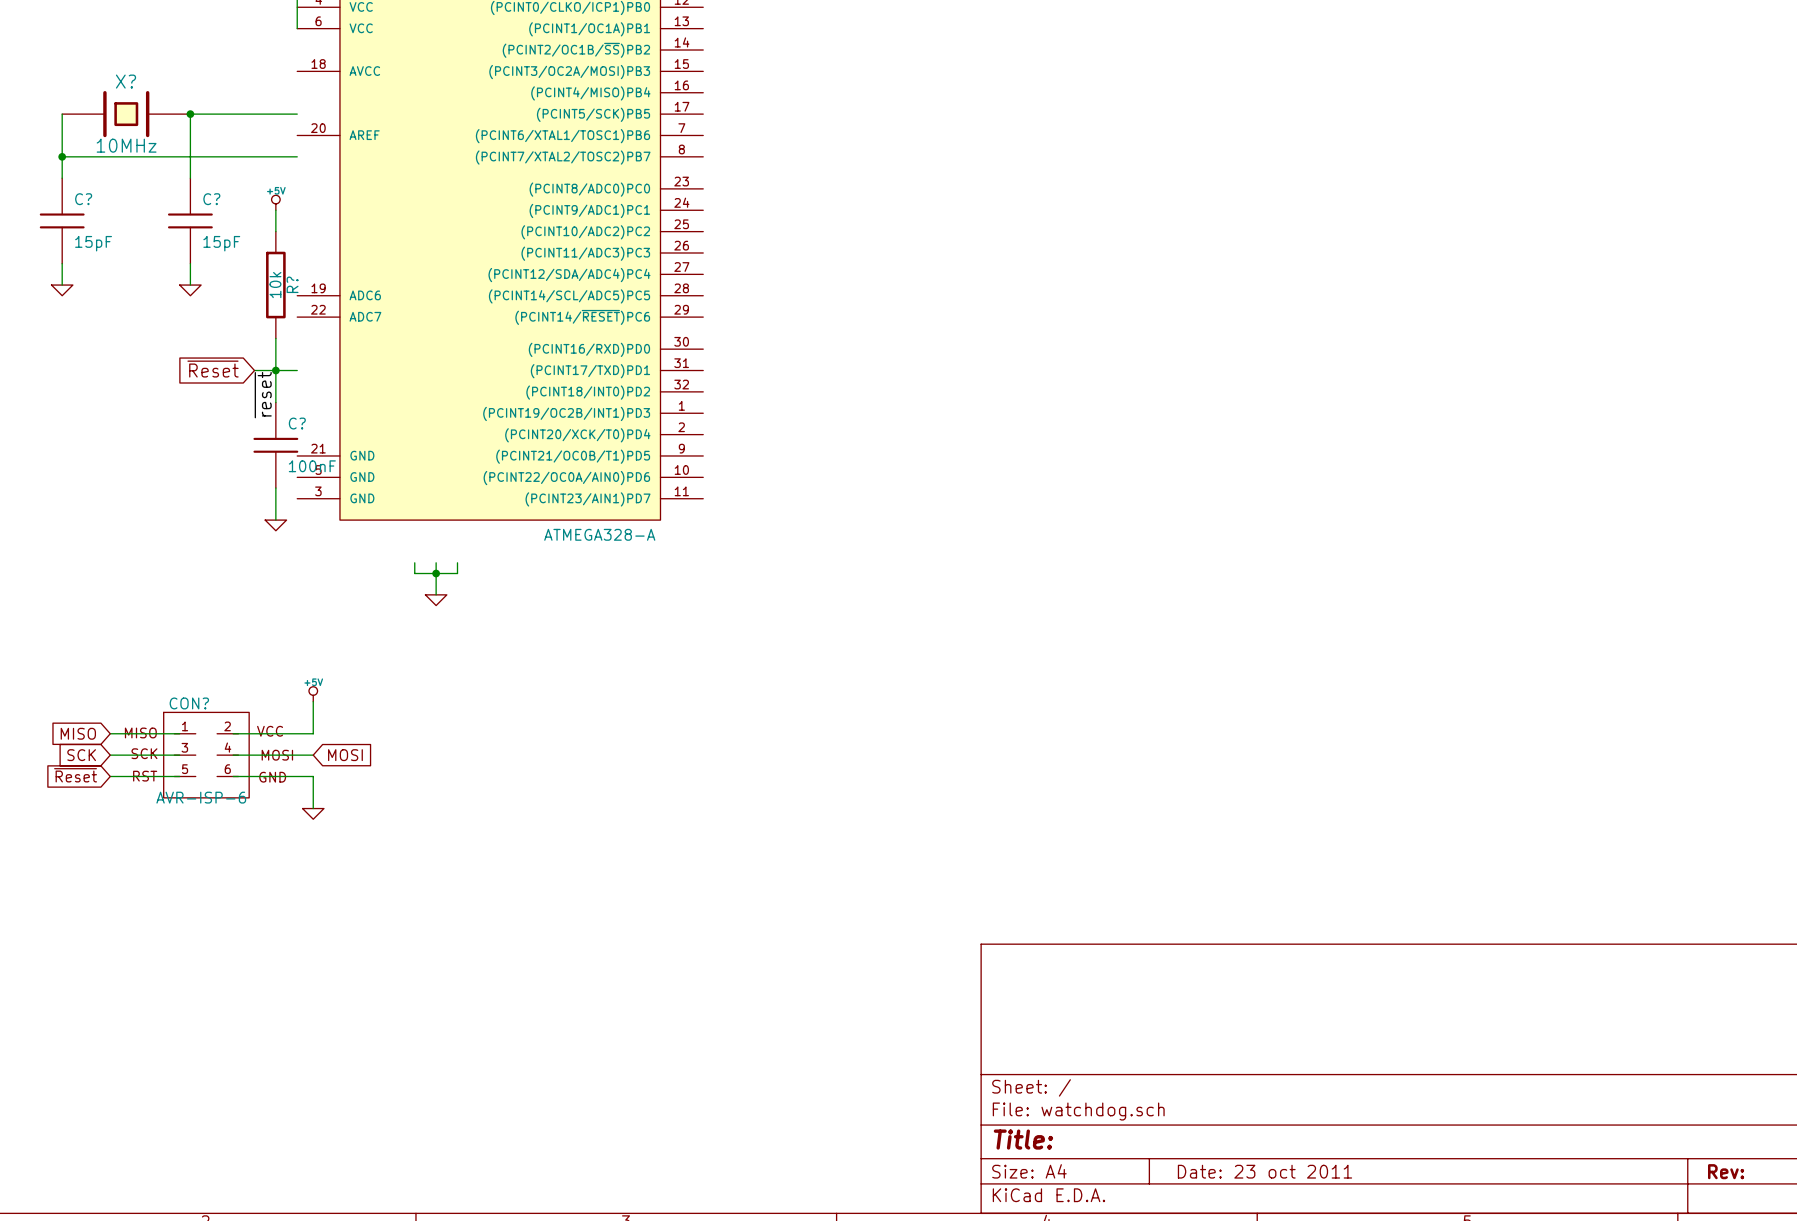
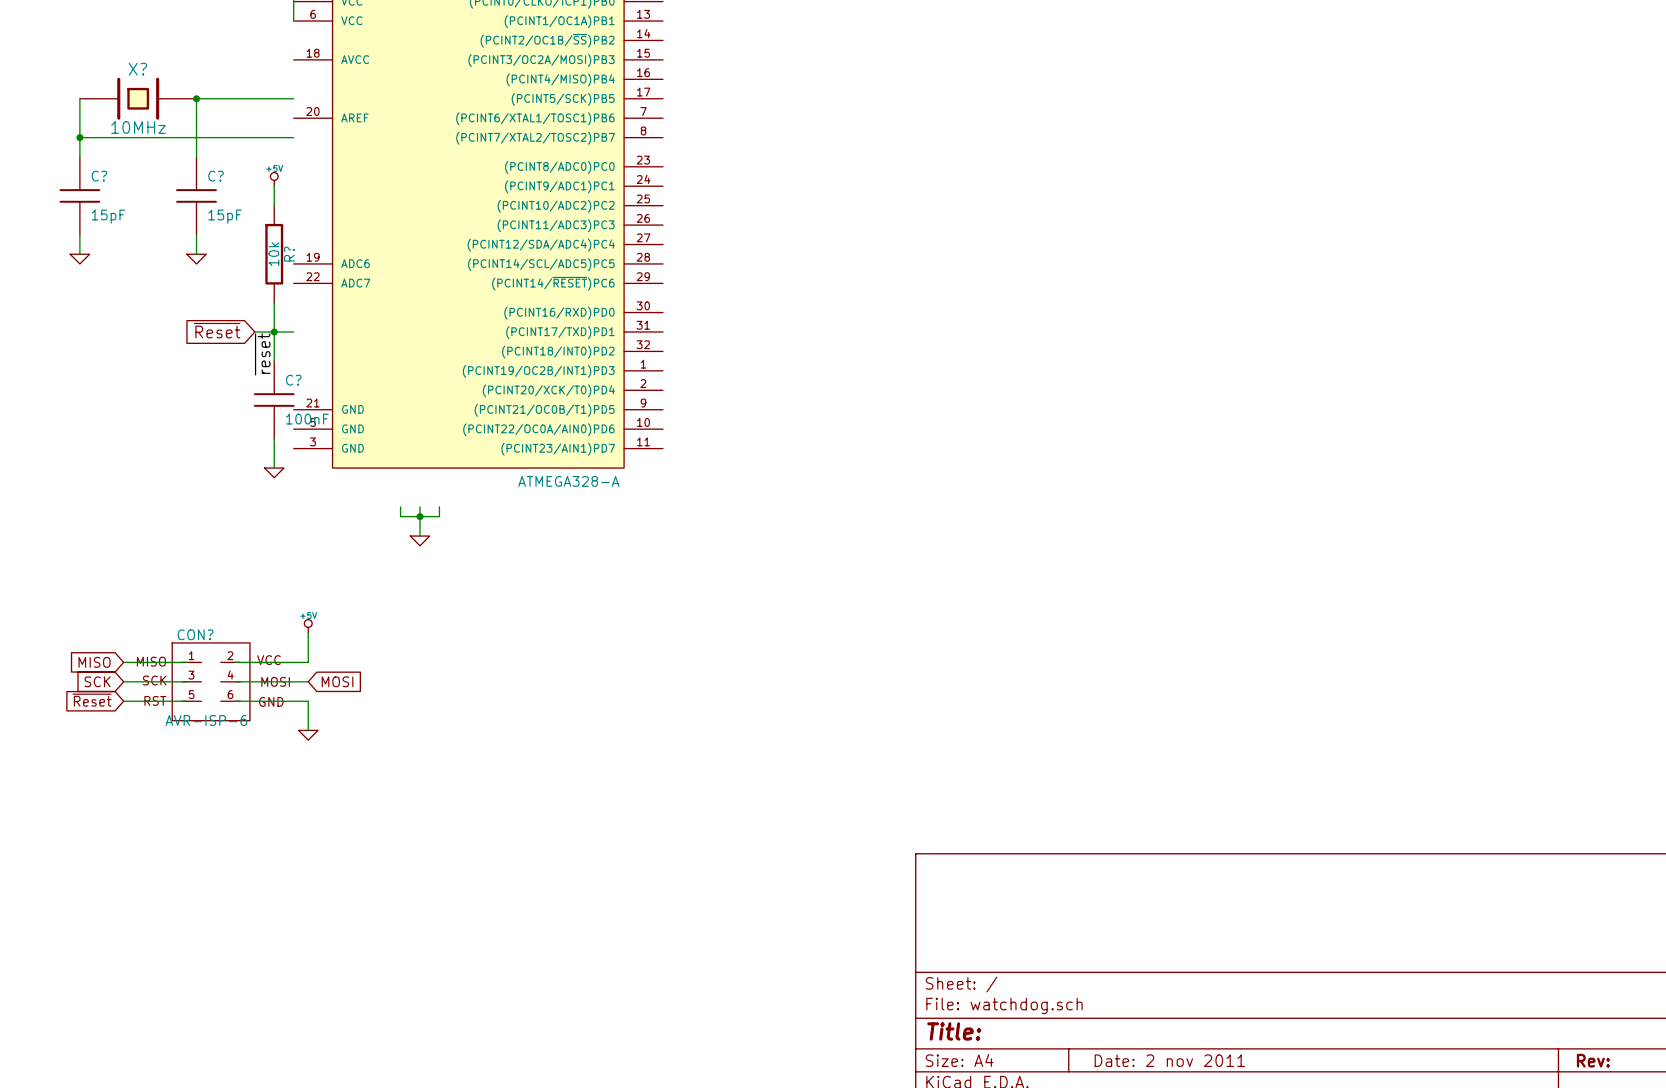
title block: Date: 23 oct 2011 (1264, 1171) -> Date: 2 nov 2011 (1169, 1060)

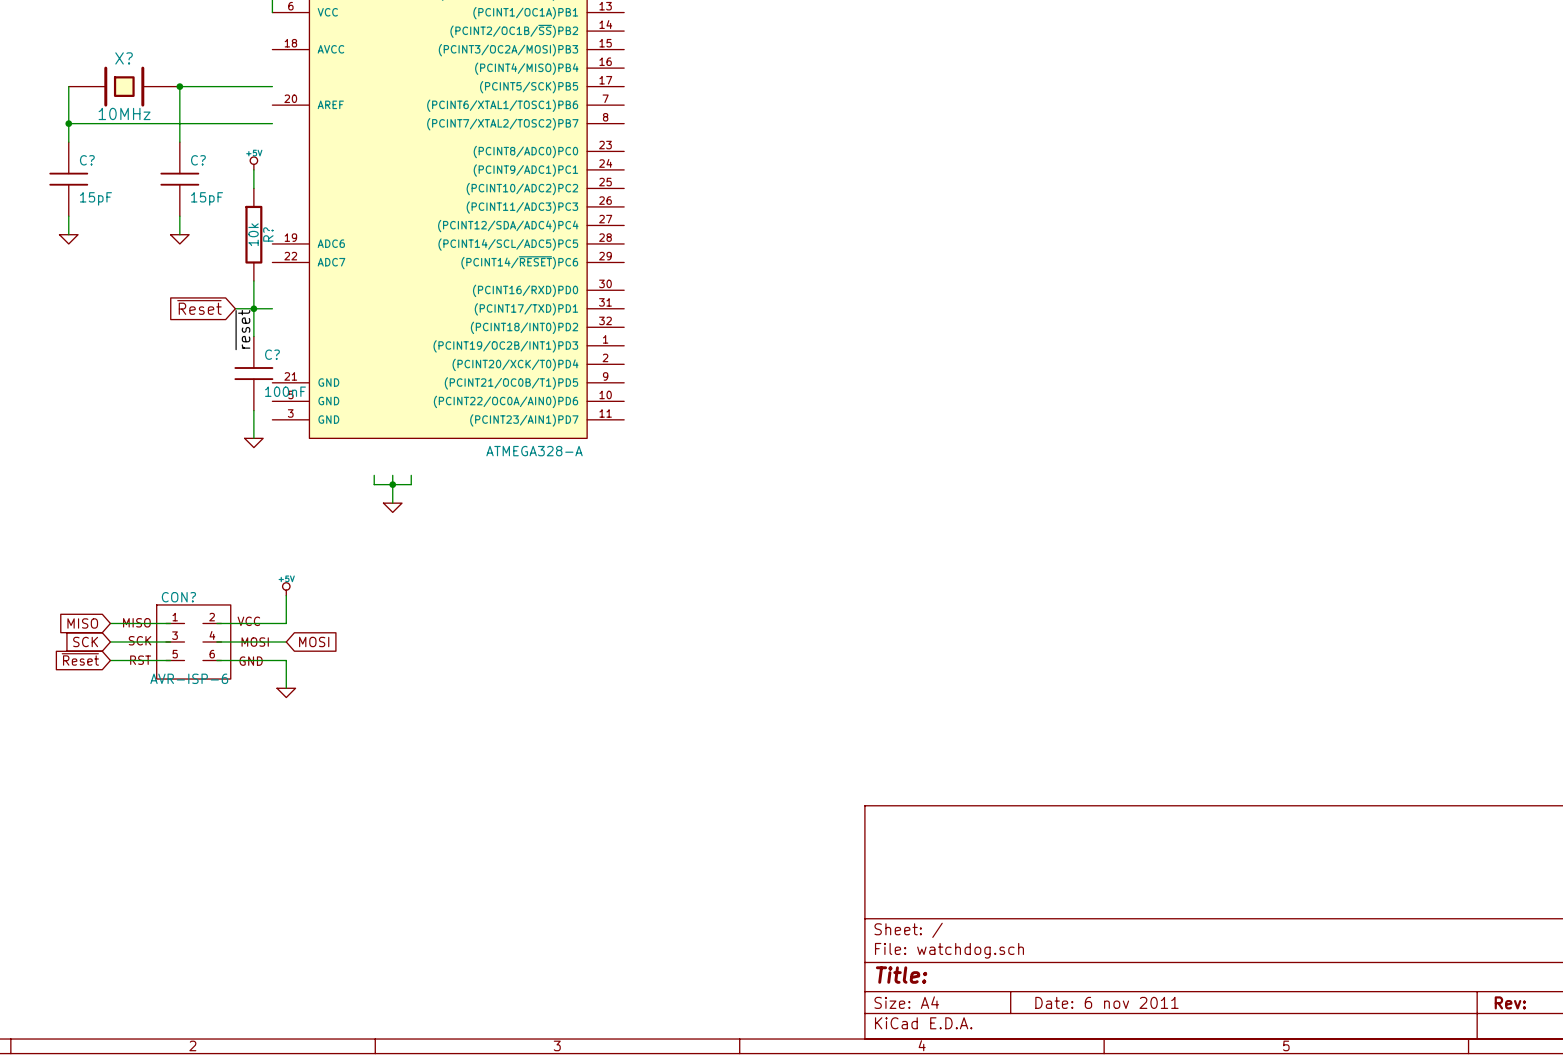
title block: Date: 2 nov 2011 (1169, 1060) -> Date: 6 nov 2011 (1106, 1002)

